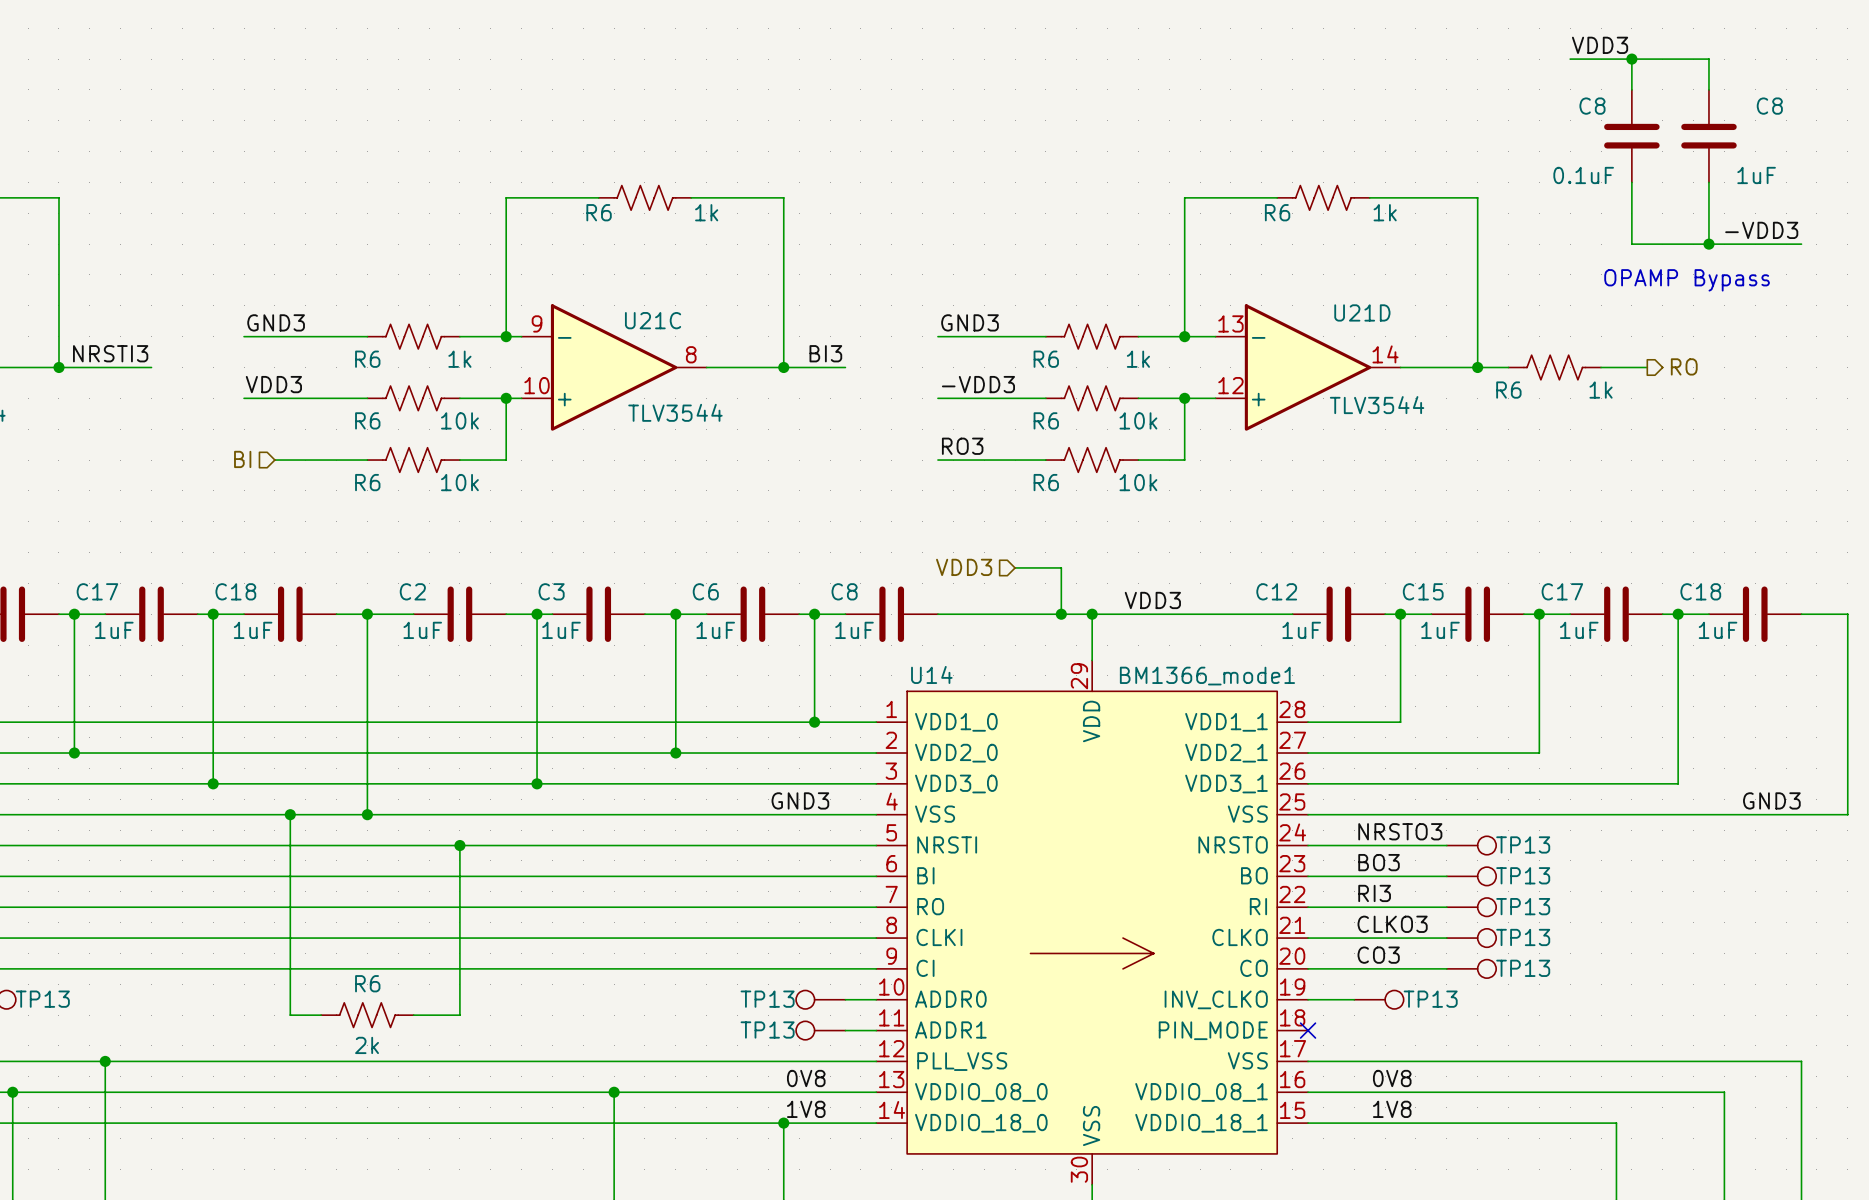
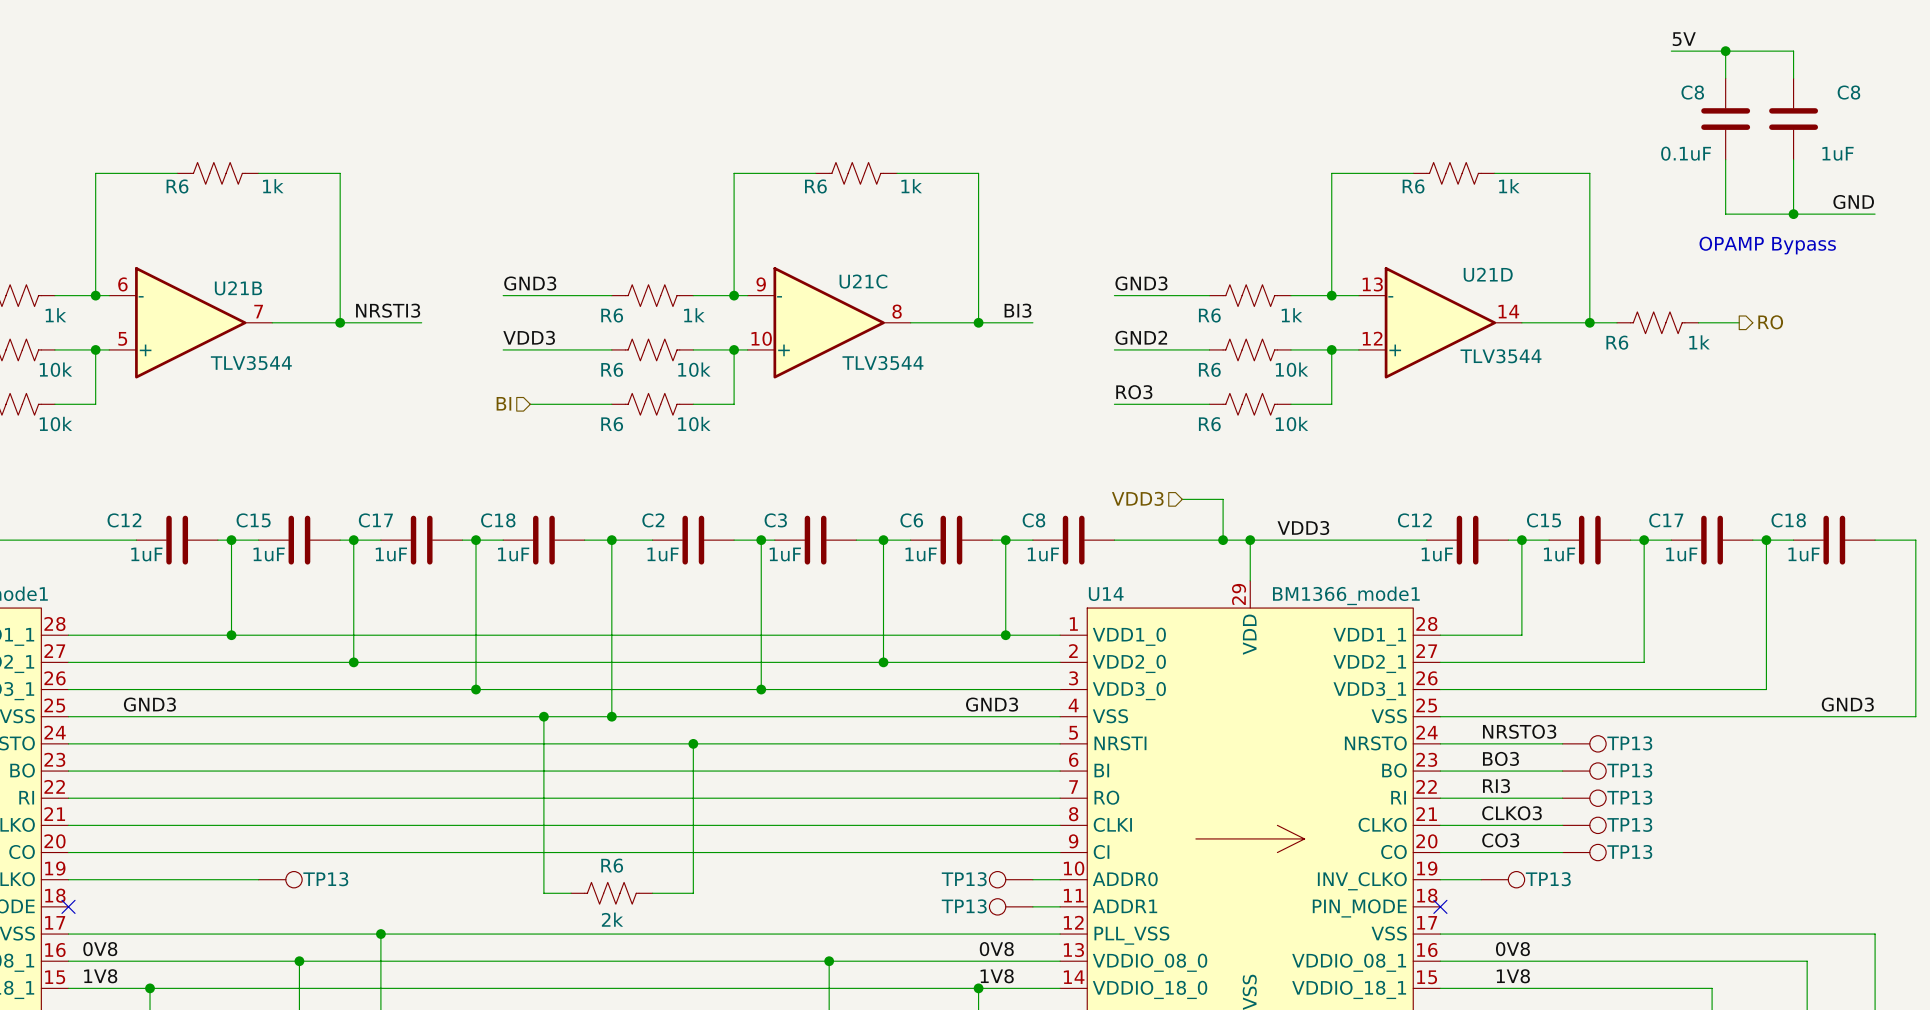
label: VDD3 (1600, 45) -> 5V (1684, 39)
label: -VDD3 (1761, 230) -> GND (1853, 202)
label: -VDD3 (978, 384) -> GND2 (1141, 337)

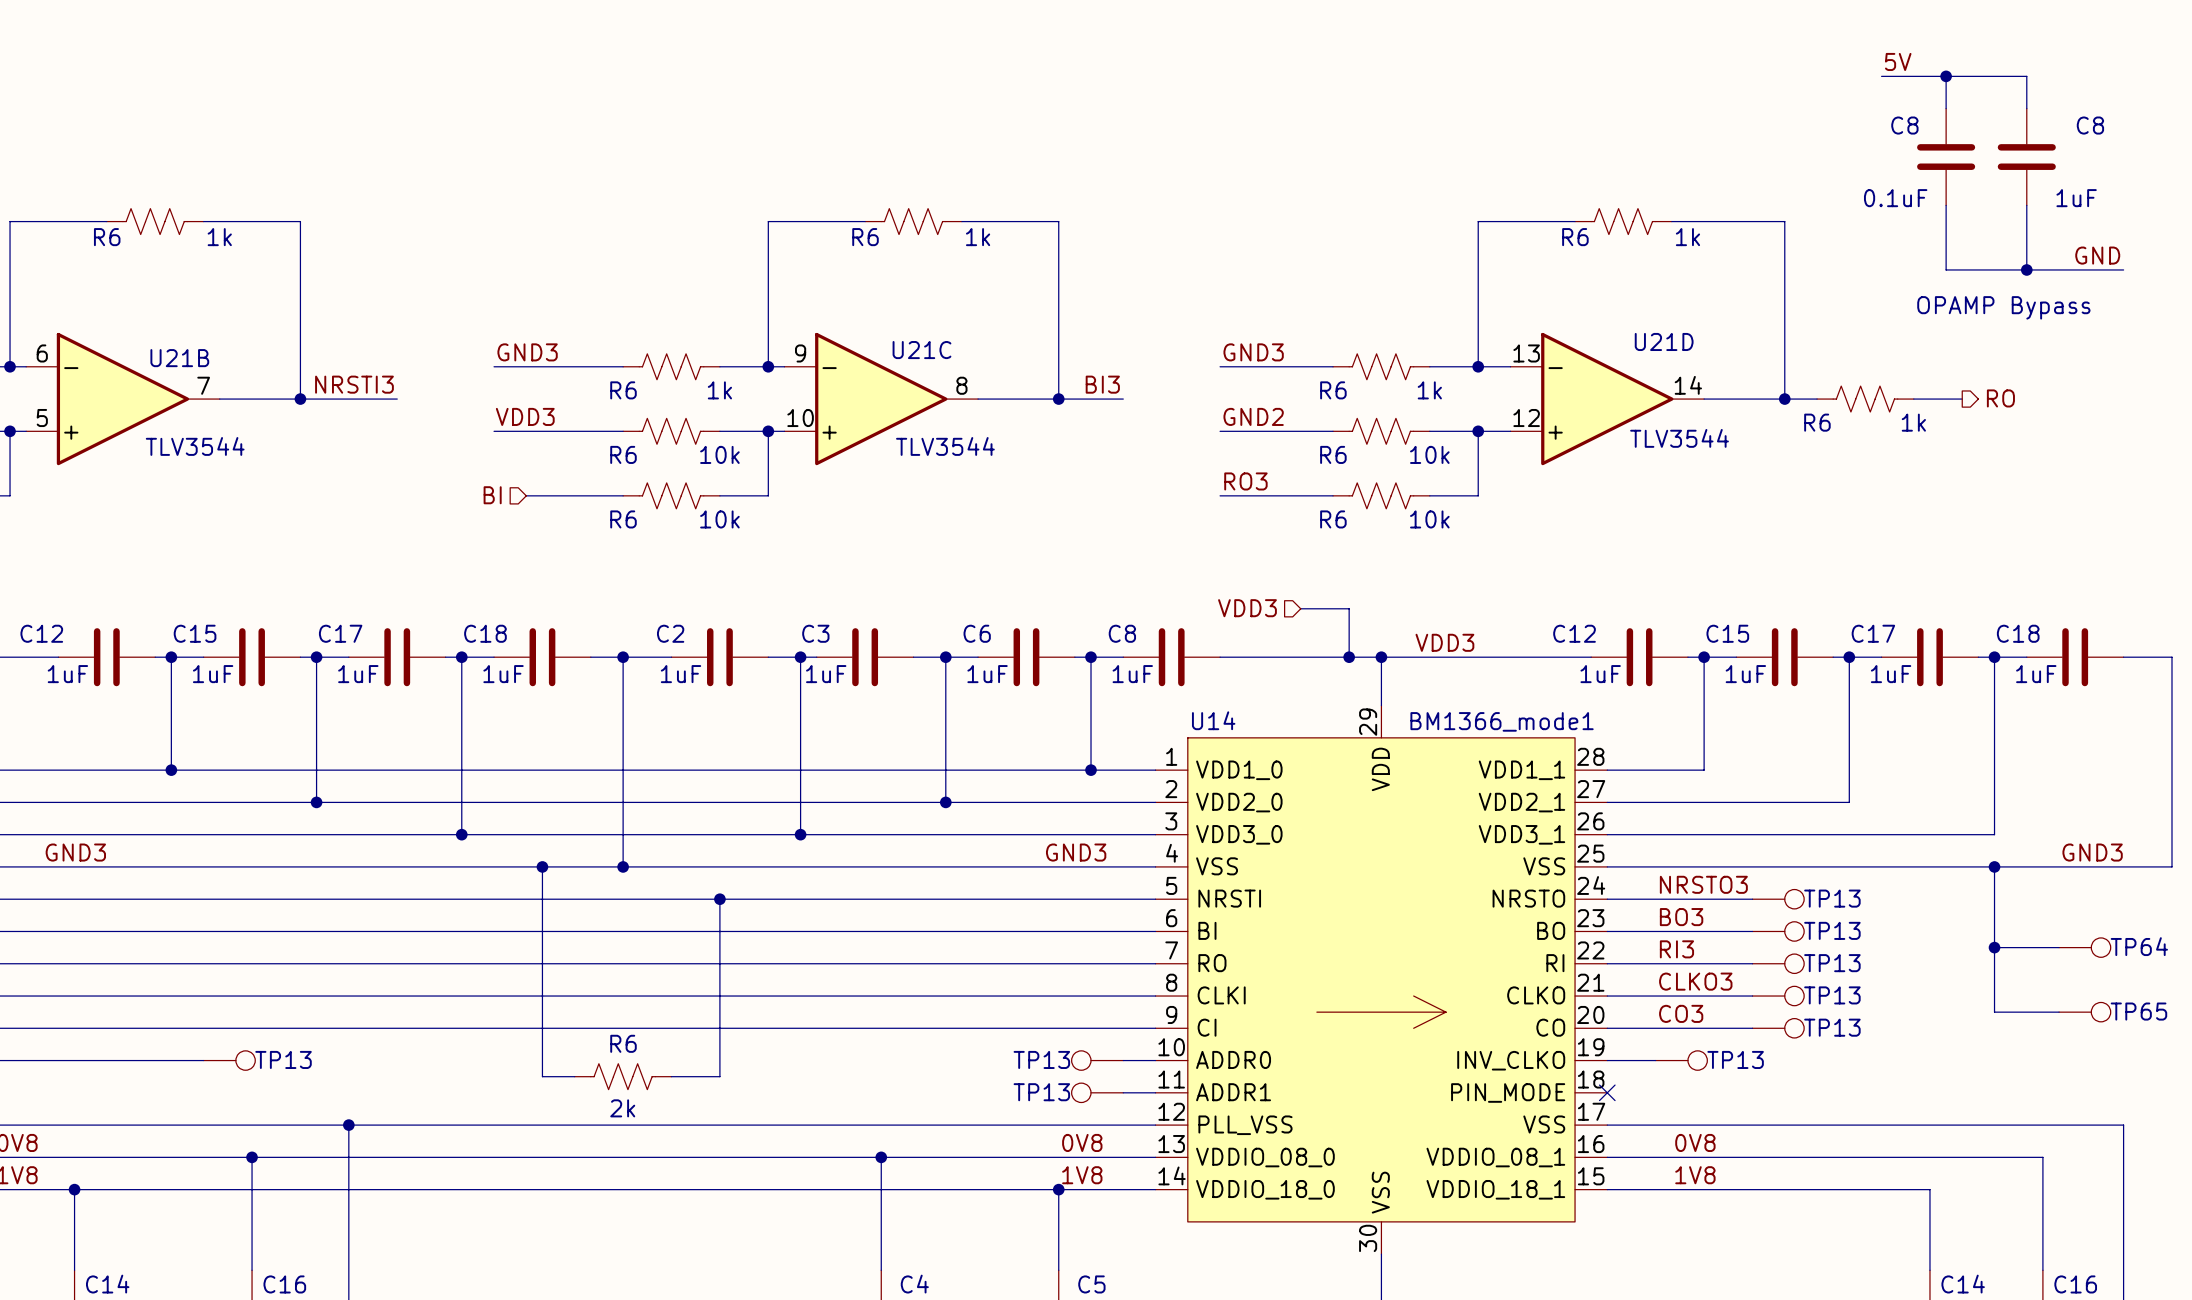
wire: none -> (1994, 866) (1994, 1012) (2059, 1012)
junction: none -> (1994, 866)
wire: none -> (1994, 947) (2059, 947)
junction: none -> (1994, 947)
TP64: none -> (2084, 947)
TP65: none -> (2084, 1012)

